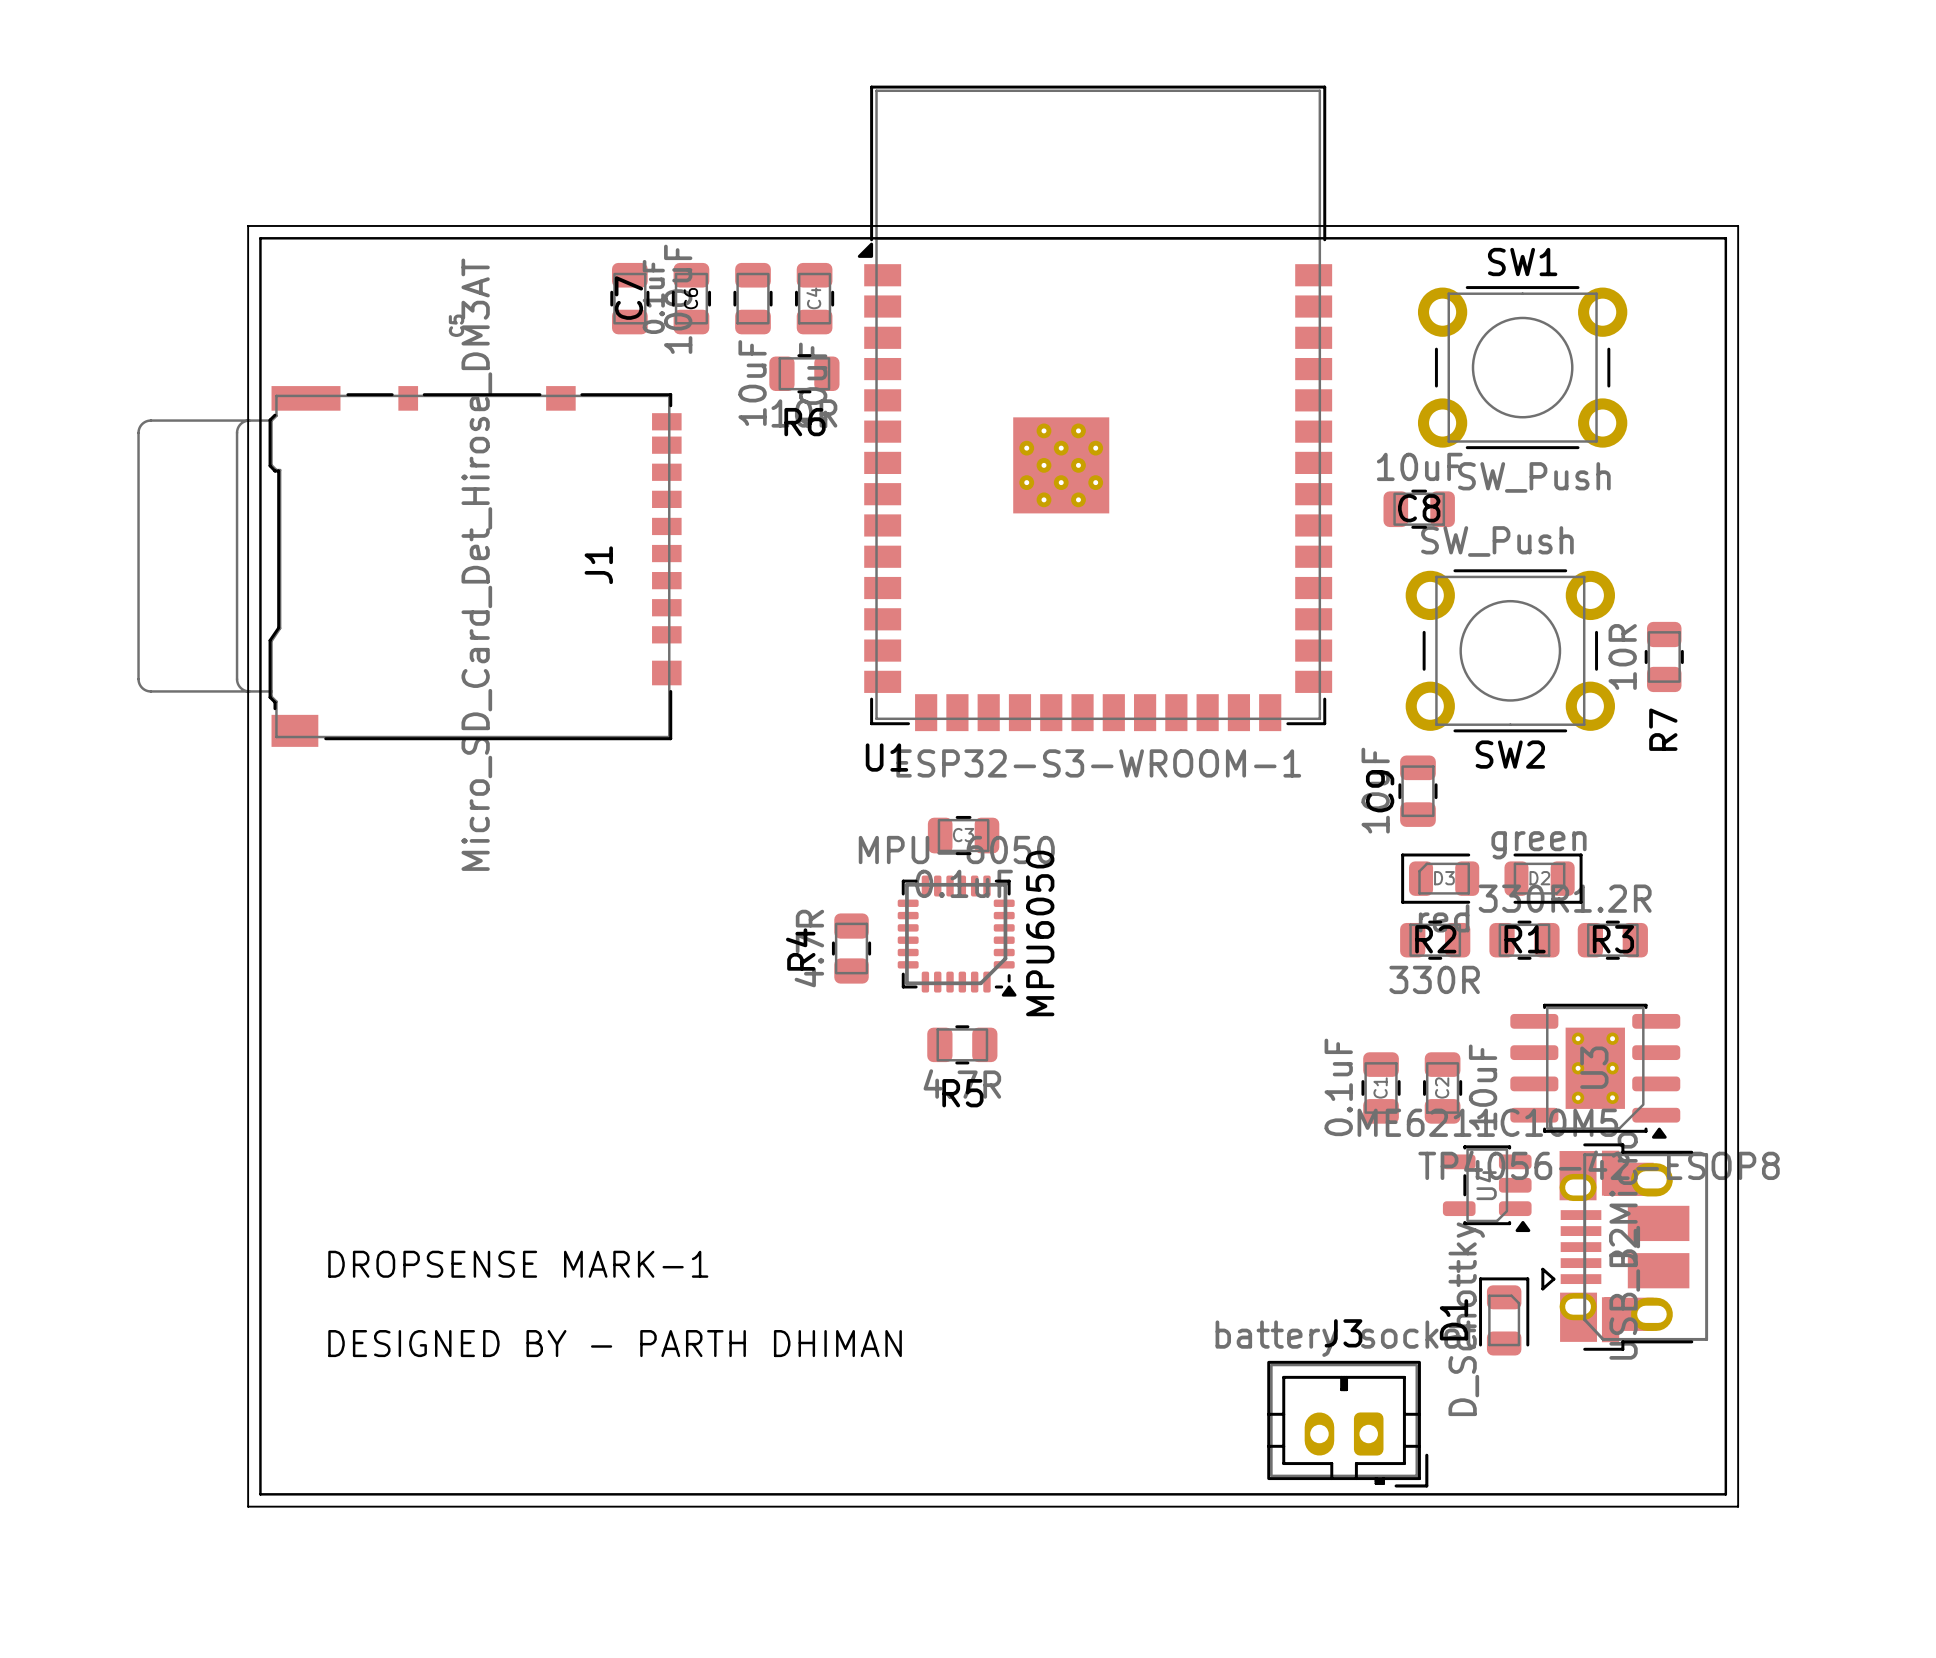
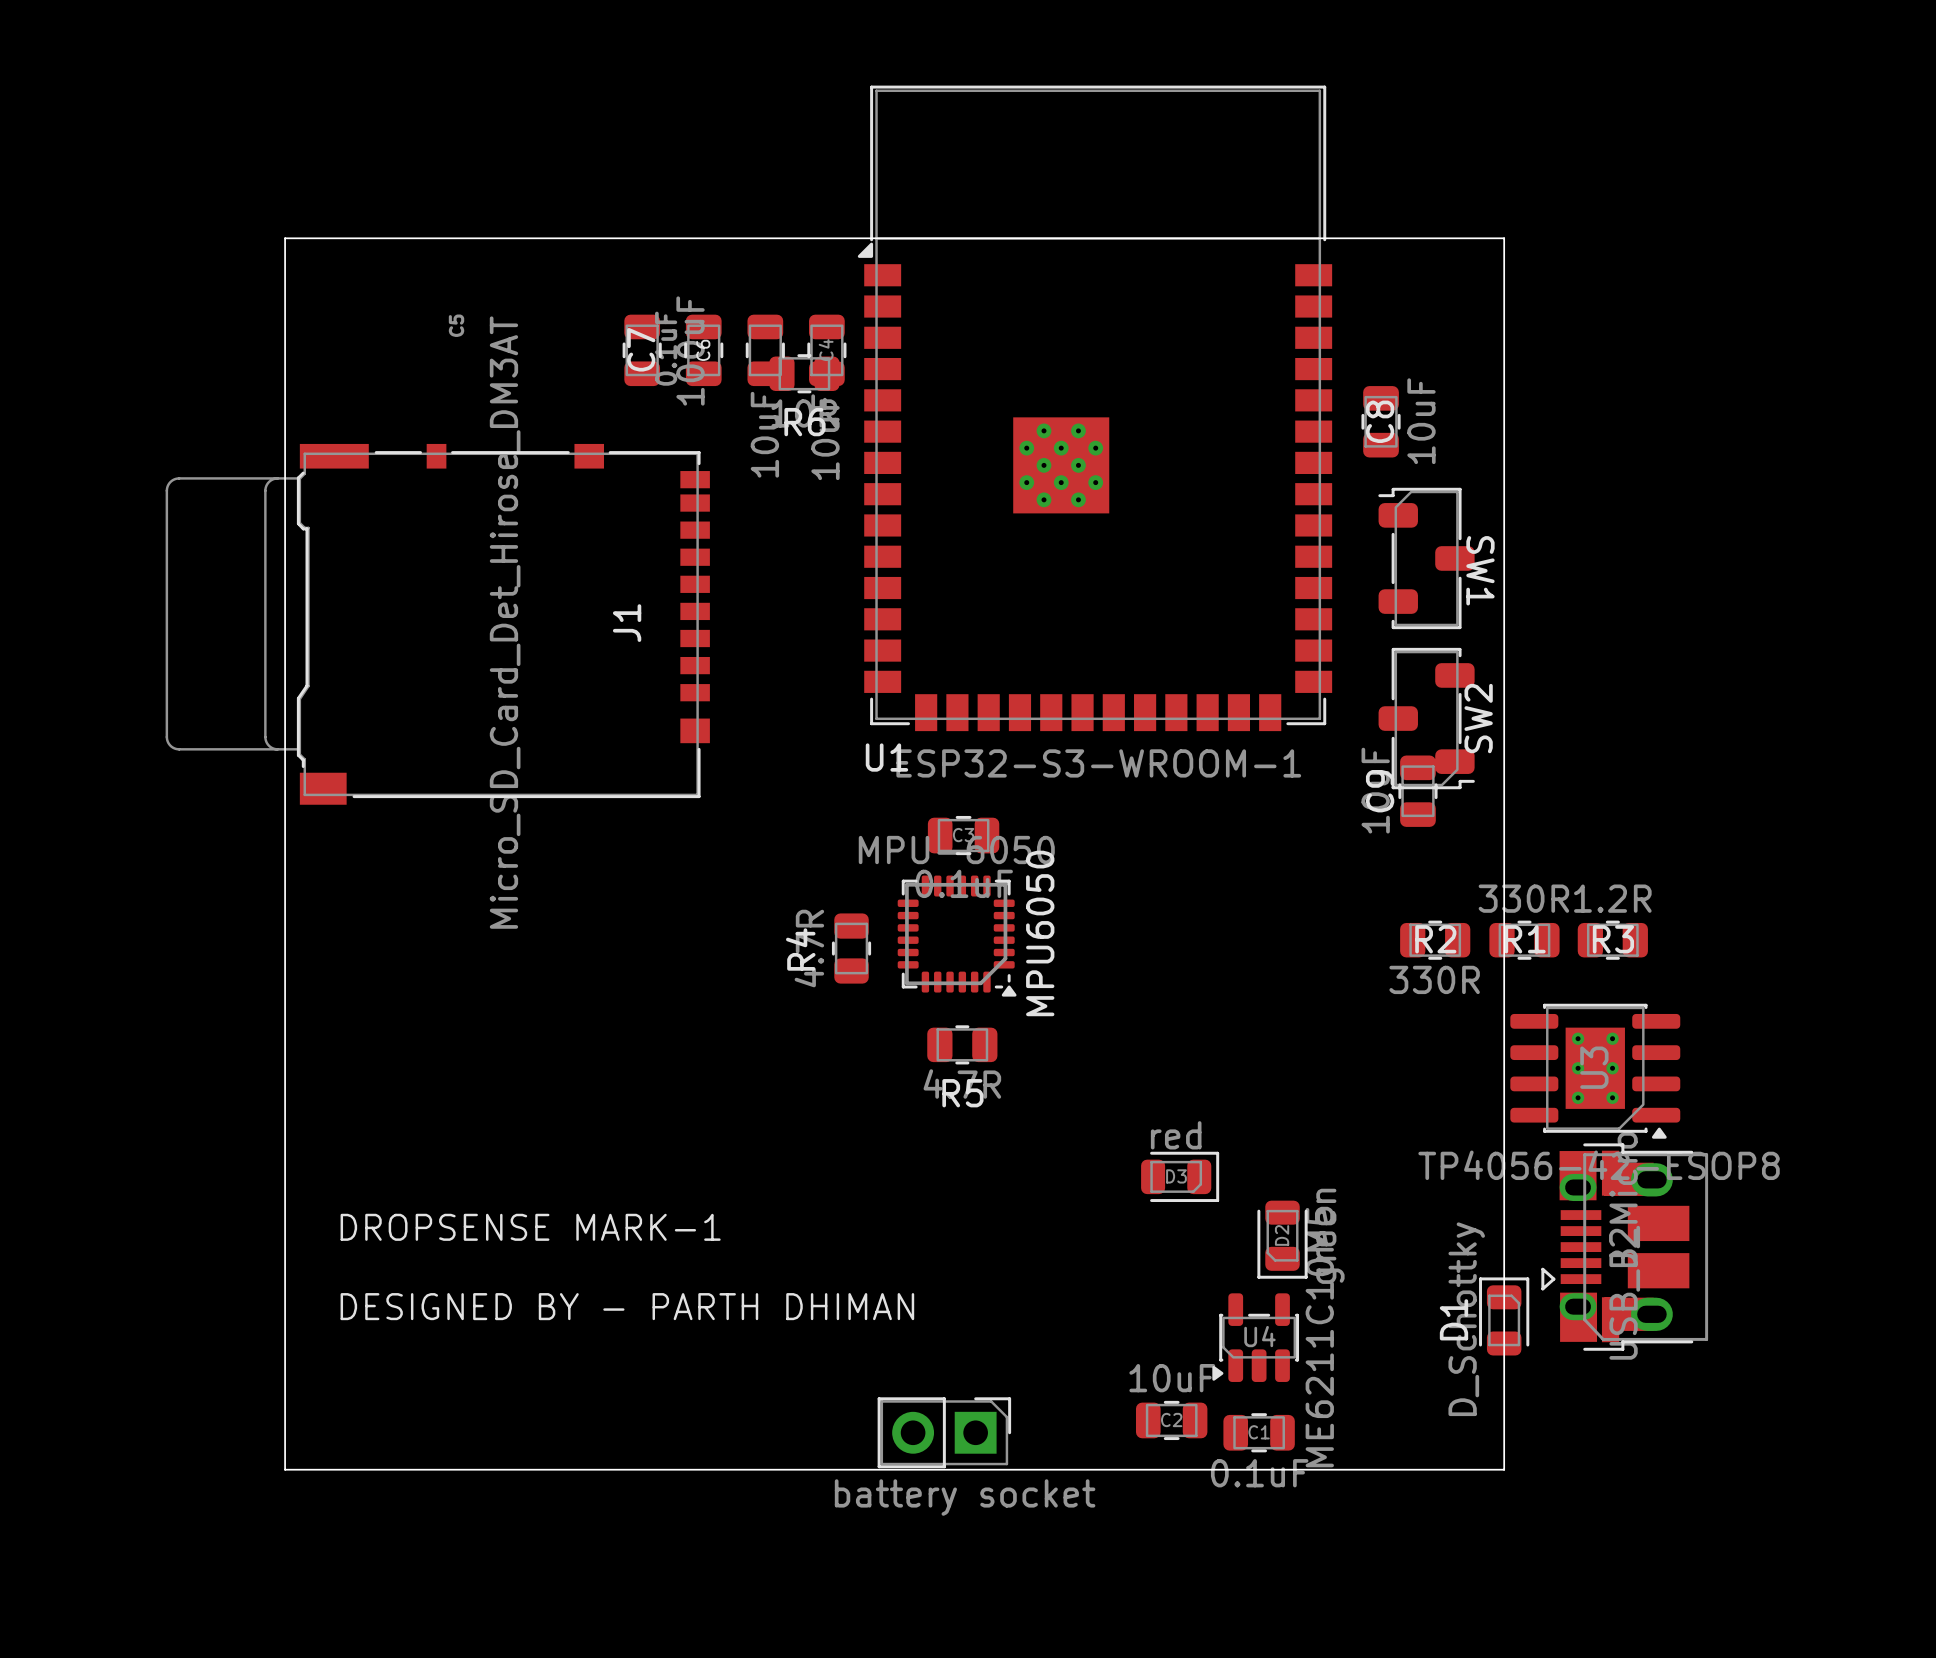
board edge: (248, 225) (1738, 225) (1738, 1506) (248, 1506) (248, 225) -> (285, 238) (285, 1469) (1504, 1469) (1504, 238) (285, 238)
line: (260, 238) (1725, 238) (1725, 1494) (260, 1494) (260, 238) -> none
SW1 name position: SW1 (1522, 262) -> SW1 (1480, 570)
SW1 footprint: [1417, 286, 1628, 450] -> [1378, 487, 1475, 630]
C7 position: (629, 298) -> (642, 350)
C6 position: (691, 298) -> (703, 350)
part position: (753, 298) -> (765, 350)
C4 position: (814, 298) -> (826, 350)
SW1 value: SW_Push (1534, 477) -> none
C8 rotation: 0° (1419, 509) -> 90° clockwise (1381, 421)
C8 position: (1419, 509) -> (1381, 421)
SW2 value: SW_Push (1497, 541) -> none
J1 position: (409, 566) -> (437, 624)
SW2 footprint: [1405, 569, 1615, 733] -> [1378, 647, 1475, 790]
R7: 10R (1664, 656) -> none
SW2 name position: SW2 (1510, 754) -> SW2 (1478, 718)
D3 rotation: 0° (1440, 878) -> 180° (1180, 1176)
D3 position: (1440, 878) -> (1180, 1176)
D2 rotation: 0° (1543, 878) -> 90° clockwise (1282, 1239)
D2 position: (1543, 878) -> (1282, 1239)
C1 value position: 0.1uF (1338, 1087) -> 0.1uF (1259, 1473)
C1 rotation: 0° (1381, 1087) -> 90° clockwise (1259, 1432)
C1 position: (1381, 1087) -> (1259, 1432)
C2 rotation: 0° (1442, 1087) -> 90° clockwise (1171, 1420)
C2 position: (1442, 1087) -> (1171, 1420)
C2 value position: 10uF (1483, 1087) -> 10uF (1172, 1378)
U4 rotation: 0° (1487, 1188) -> 90° clockwise (1255, 1337)
U4 position: (1487, 1188) -> (1255, 1337)
text position: DROPSENSE MARK-1 (518, 1264) -> DROPSENSE MARK-1 (530, 1227)
text position: DESIGNED BY - PARTH DHIMAN (615, 1343) -> DESIGNED BY - PARTH DHIMAN (627, 1306)
J3: battery socket (1347, 1424) -> none
part: none -> battery socket (944, 1432)

